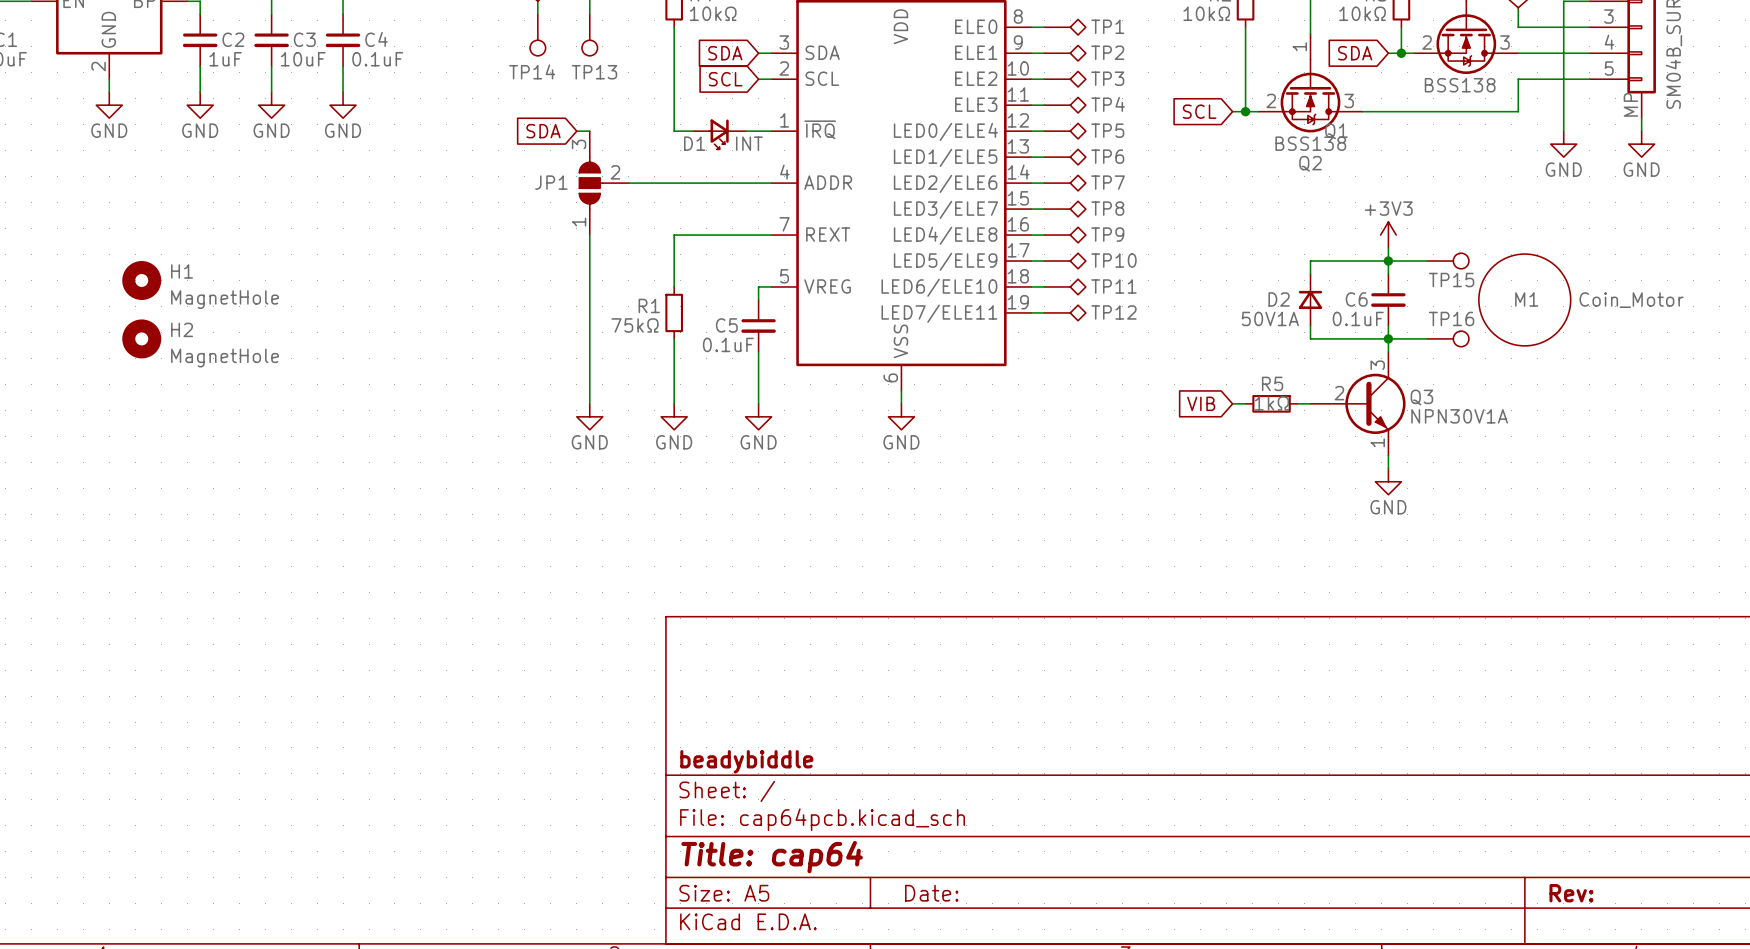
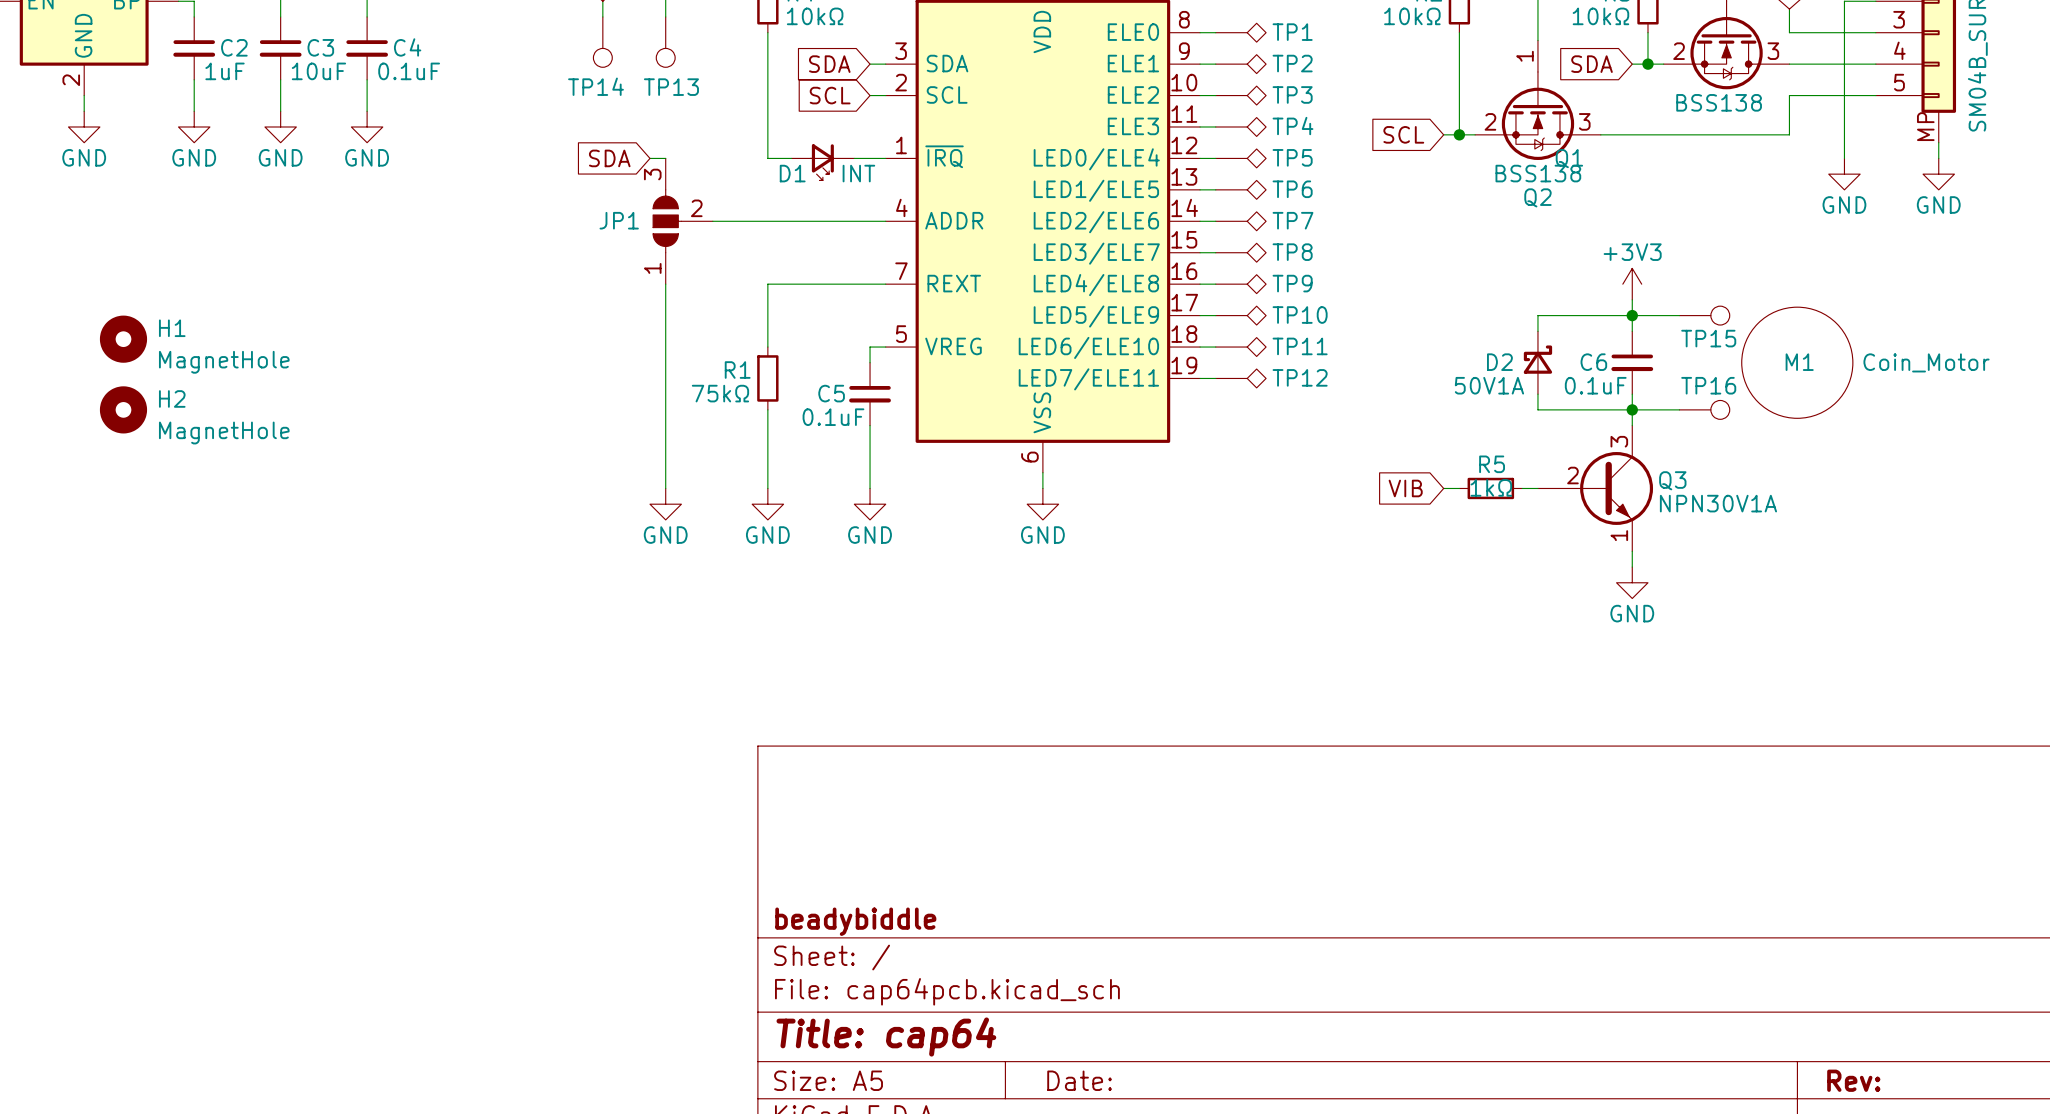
D2 symbol: [1298, 273, 1323, 326] -> [1523, 331, 1553, 395]

